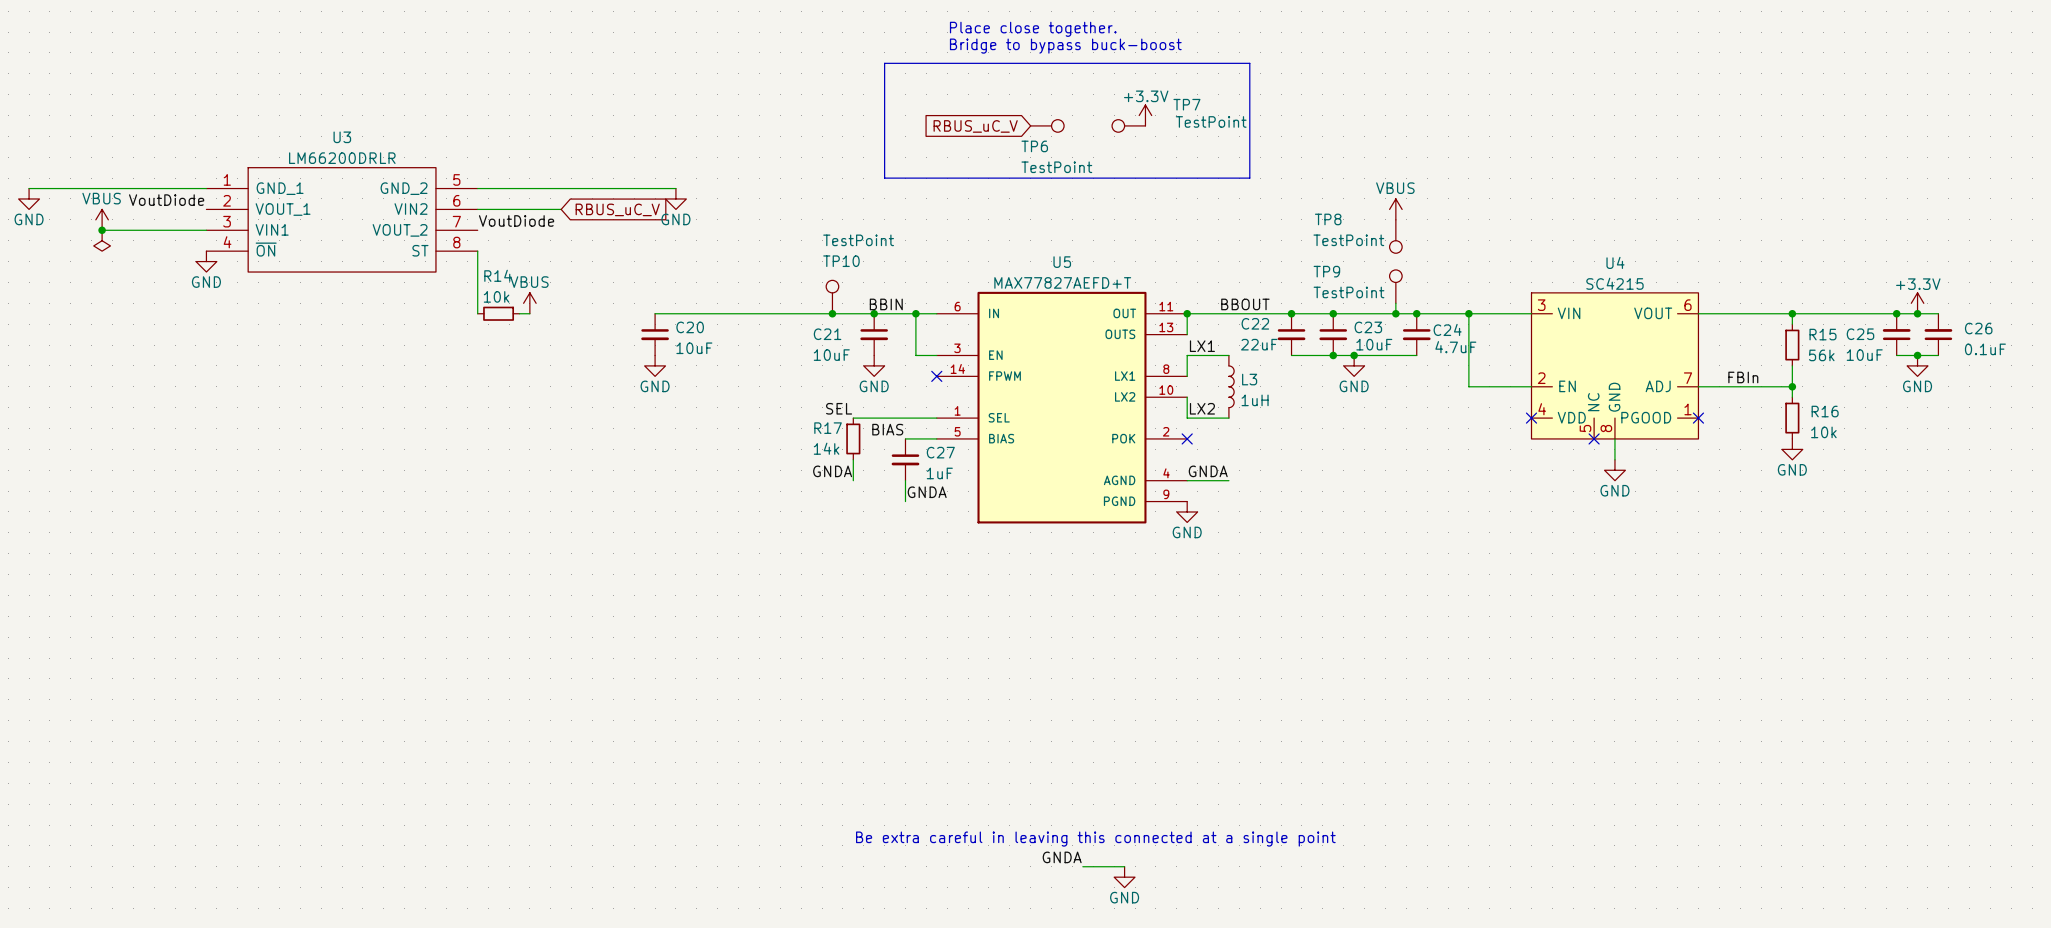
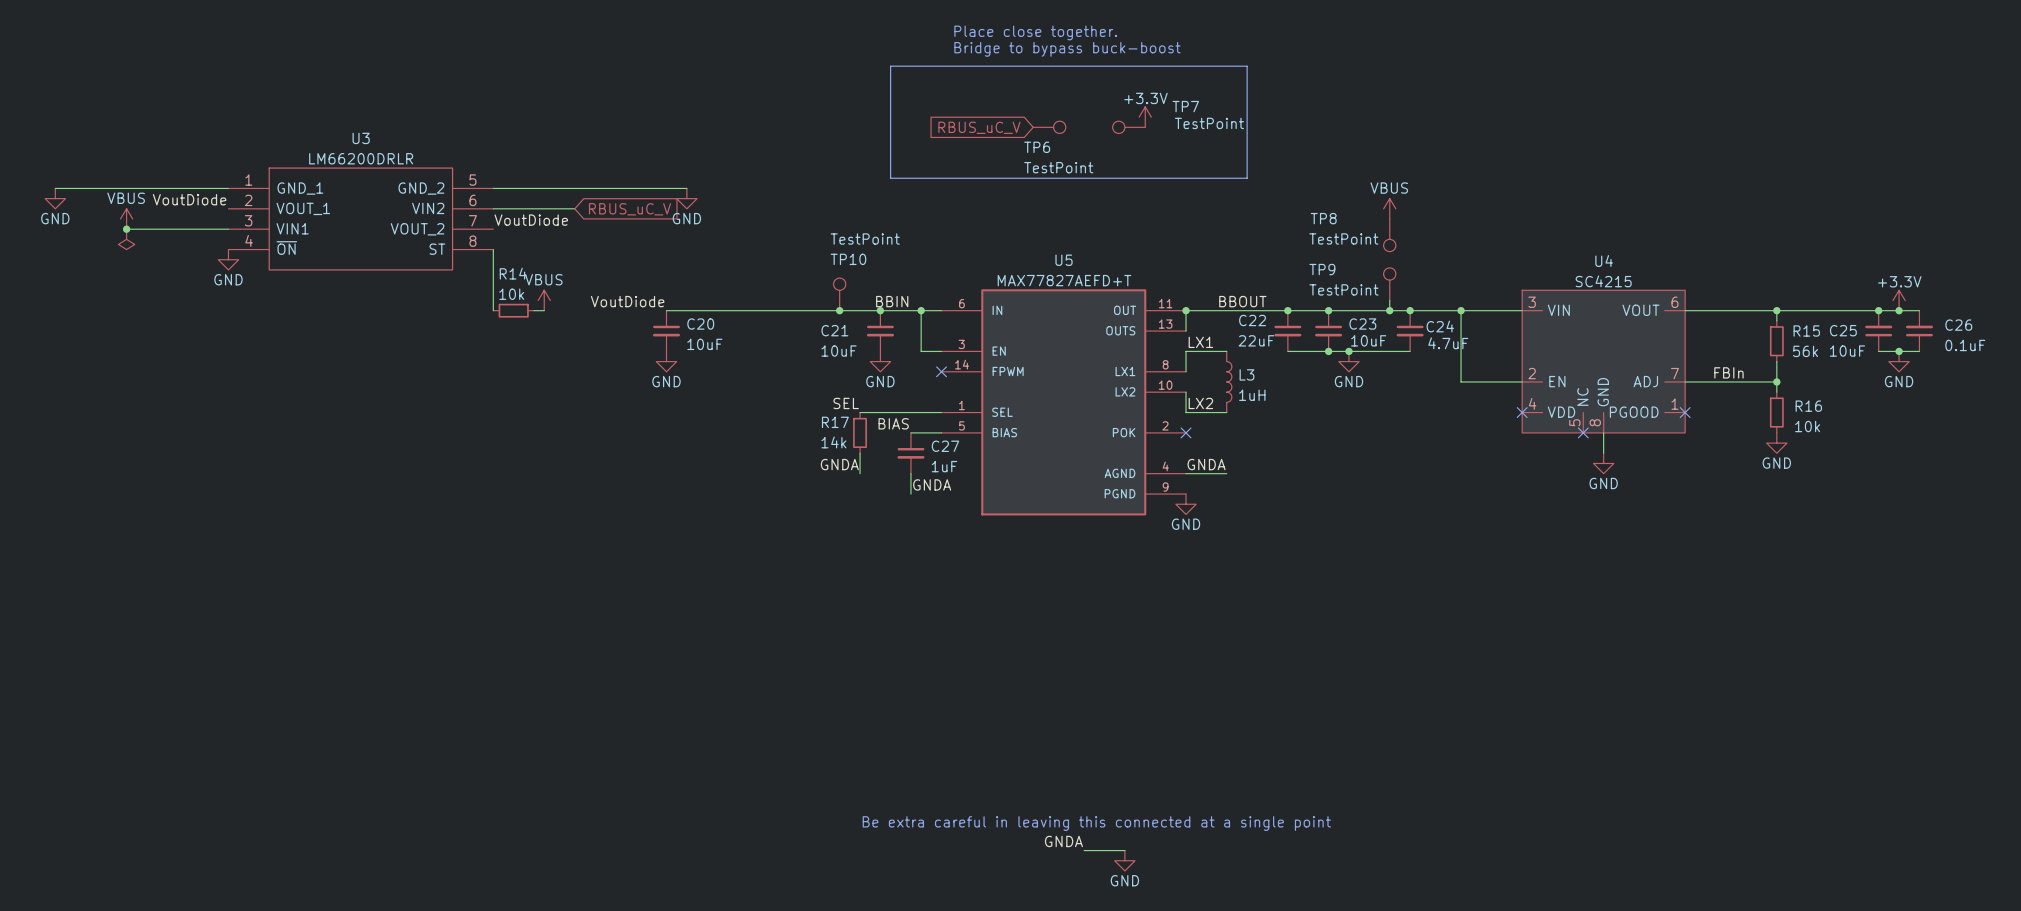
label: none -> VoutDiode (627, 301)

